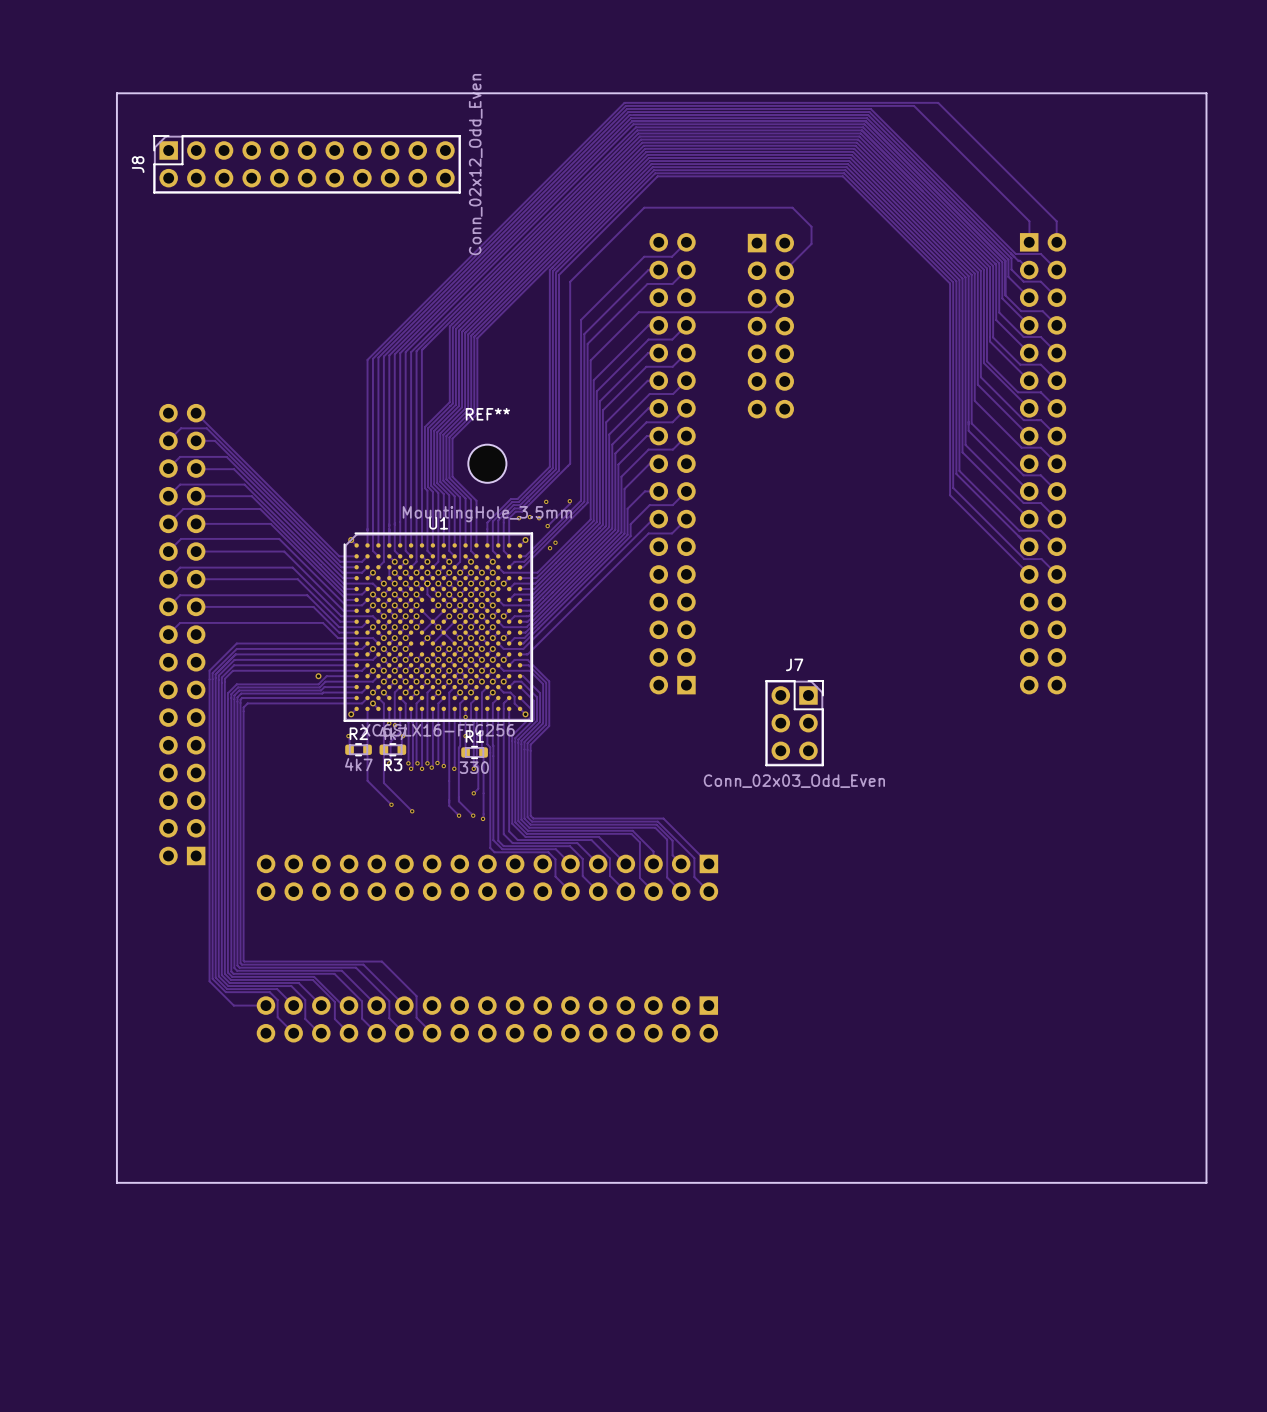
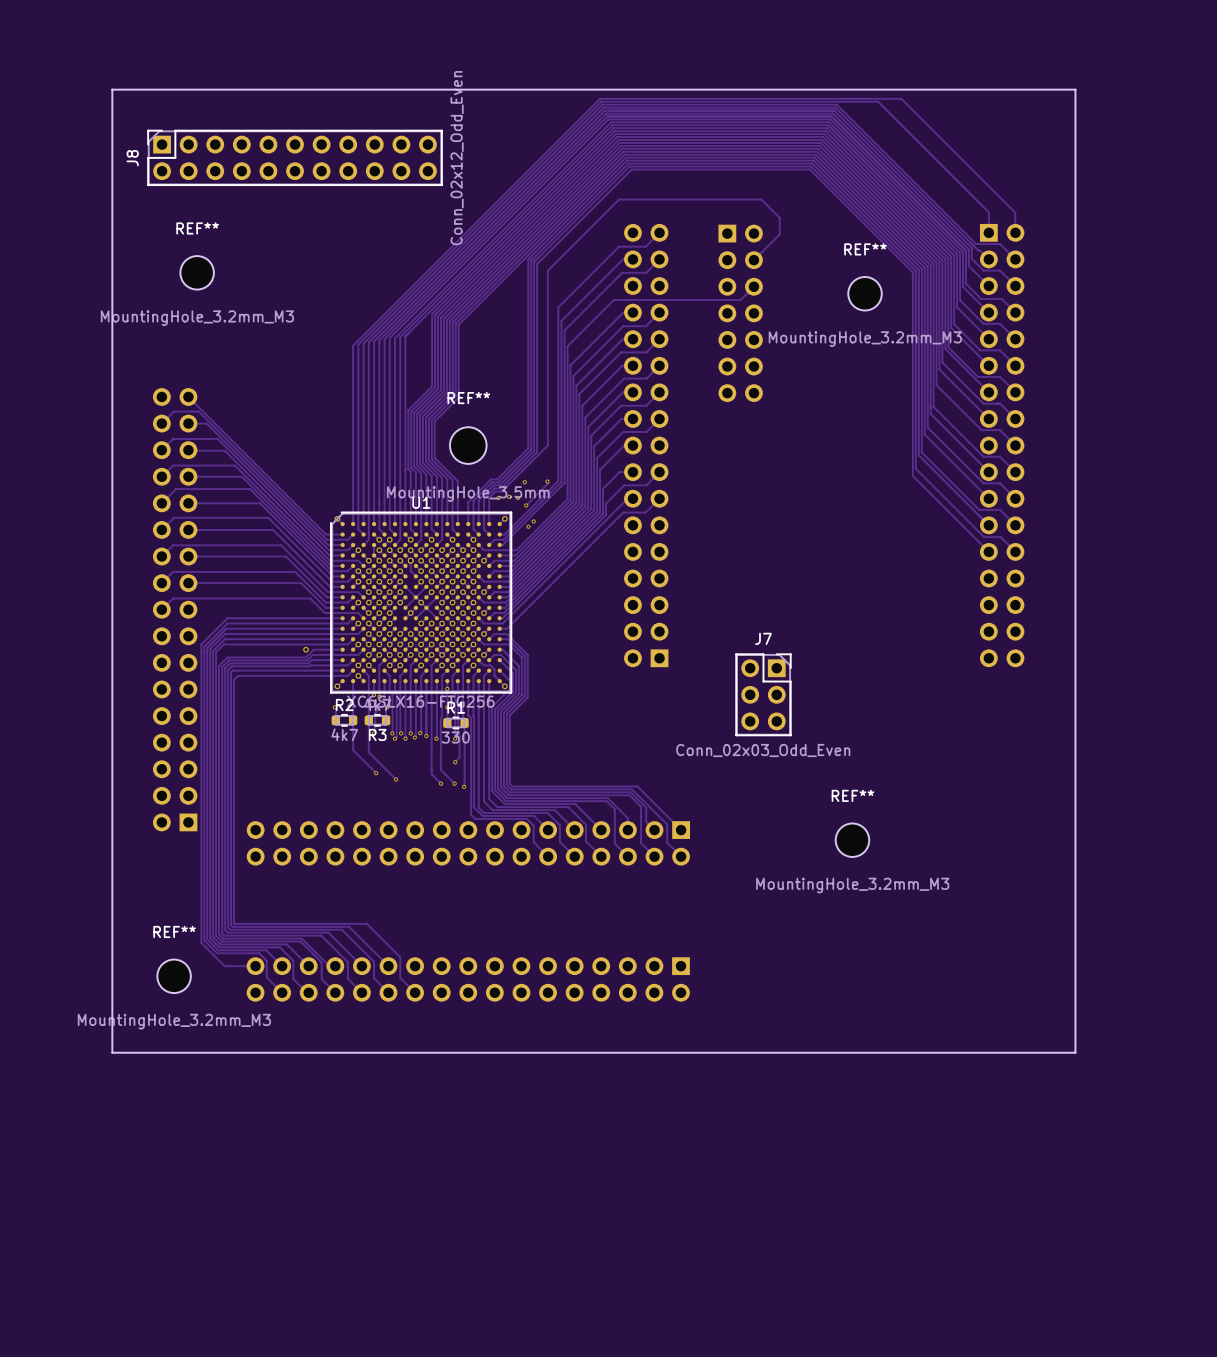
board edge: (1119, 93) (1206, 93) (1206, 1182) (116, 1182) (116, 1095) -> (1075, 89) (1075, 1052) (112, 1052)
REF**: none -> MountingHole_3.2mm_M3 (197, 272)
REF**: none -> MountingHole_3.2mm_M3 (865, 293)
REF**: none -> MountingHole_3.2mm_M3 (852, 840)
REF**: none -> MountingHole_3.2mm_M3 (174, 976)

